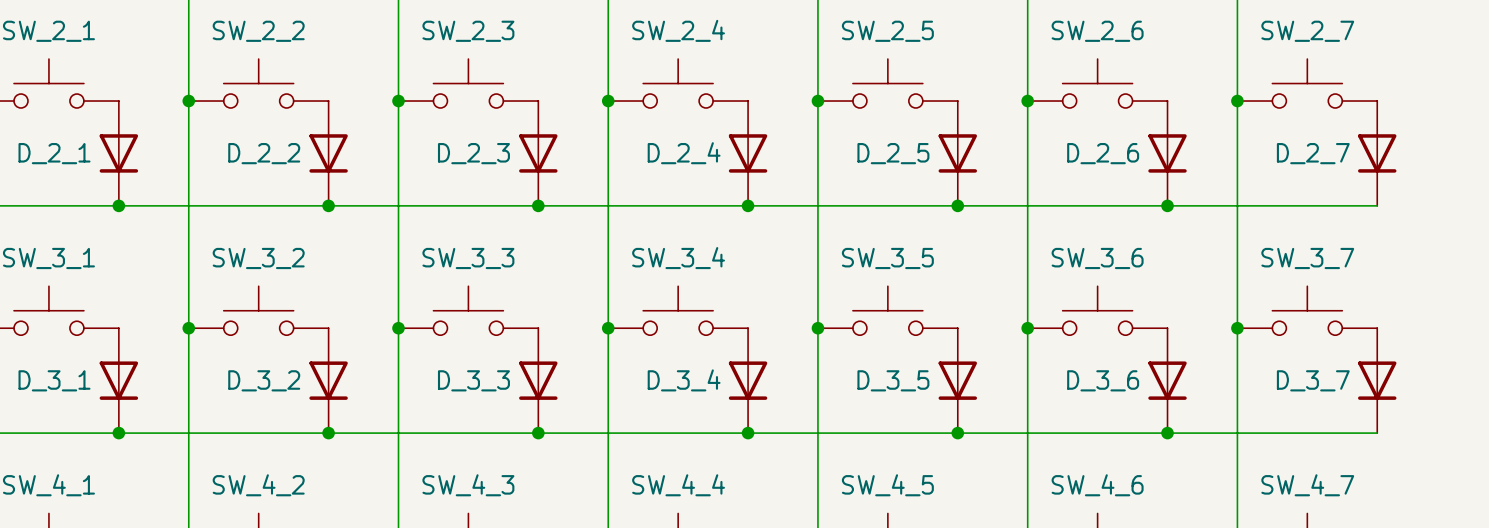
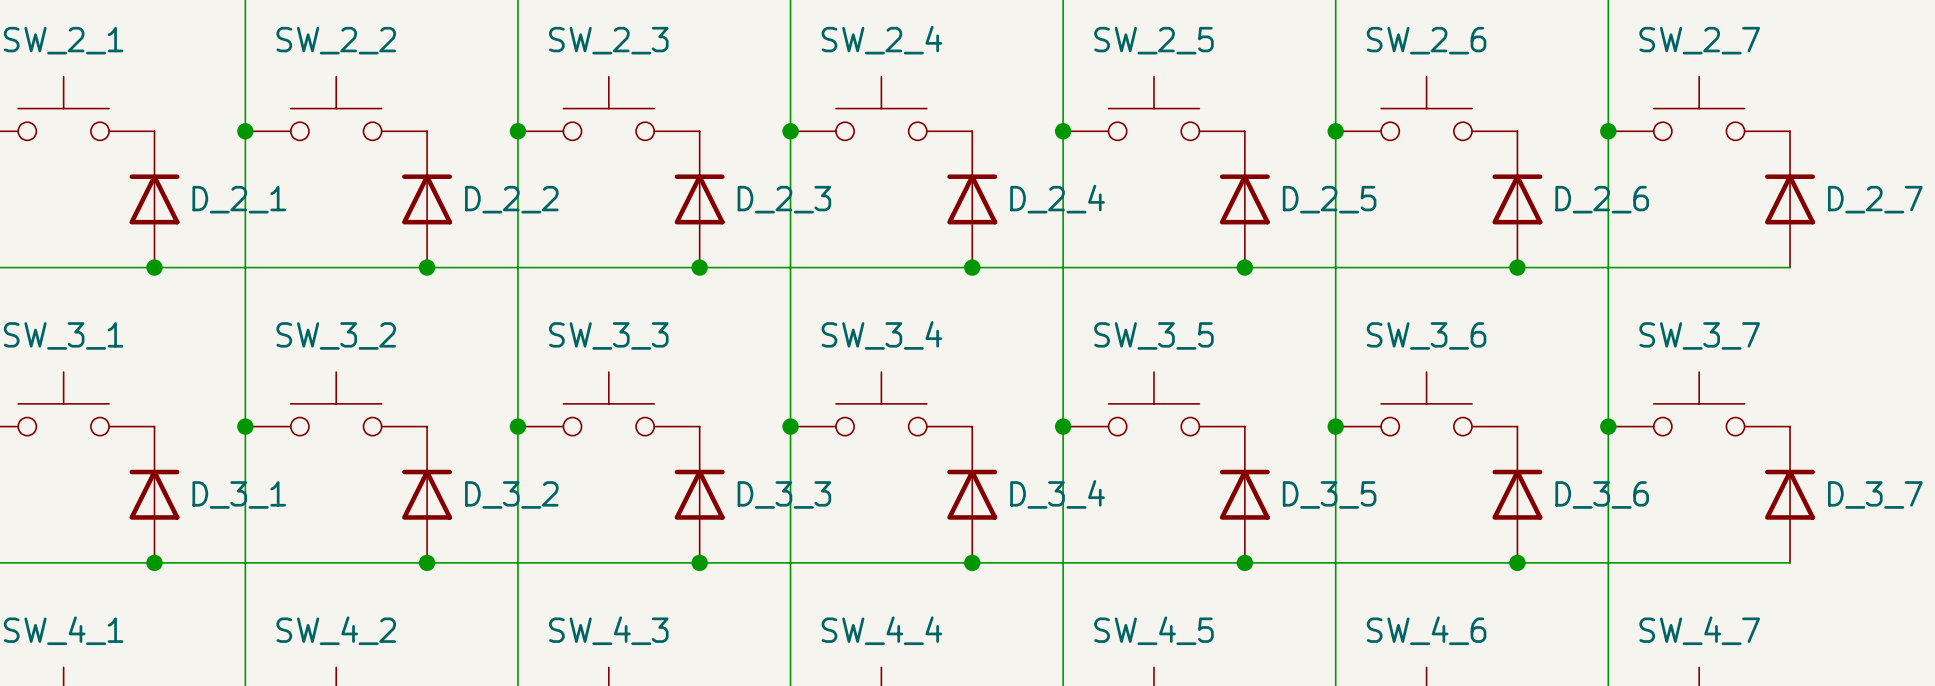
D_2_1 rotation: 0° (118, 153) -> 180° (154, 199)
D_2_2 rotation: 0° (328, 153) -> 180° (427, 199)
D_2_3 rotation: 0° (538, 153) -> 180° (699, 199)
D_2_4 rotation: 0° (748, 153) -> 180° (972, 199)
D_2_5 rotation: 0° (957, 153) -> 180° (1244, 199)
D_2_6 rotation: 0° (1167, 153) -> 180° (1517, 199)
D_2_7 rotation: 0° (1377, 153) -> 180° (1790, 199)
D_3_1 rotation: 0° (118, 380) -> 180° (154, 494)
D_3_2 rotation: 0° (328, 380) -> 180° (427, 494)
D_3_3 rotation: 0° (538, 380) -> 180° (699, 494)
D_3_4 rotation: 0° (748, 380) -> 180° (972, 494)
D_3_5 rotation: 0° (957, 380) -> 180° (1244, 494)
D_3_6 rotation: 0° (1167, 380) -> 180° (1517, 494)
D_3_7 rotation: 0° (1377, 380) -> 180° (1790, 494)

